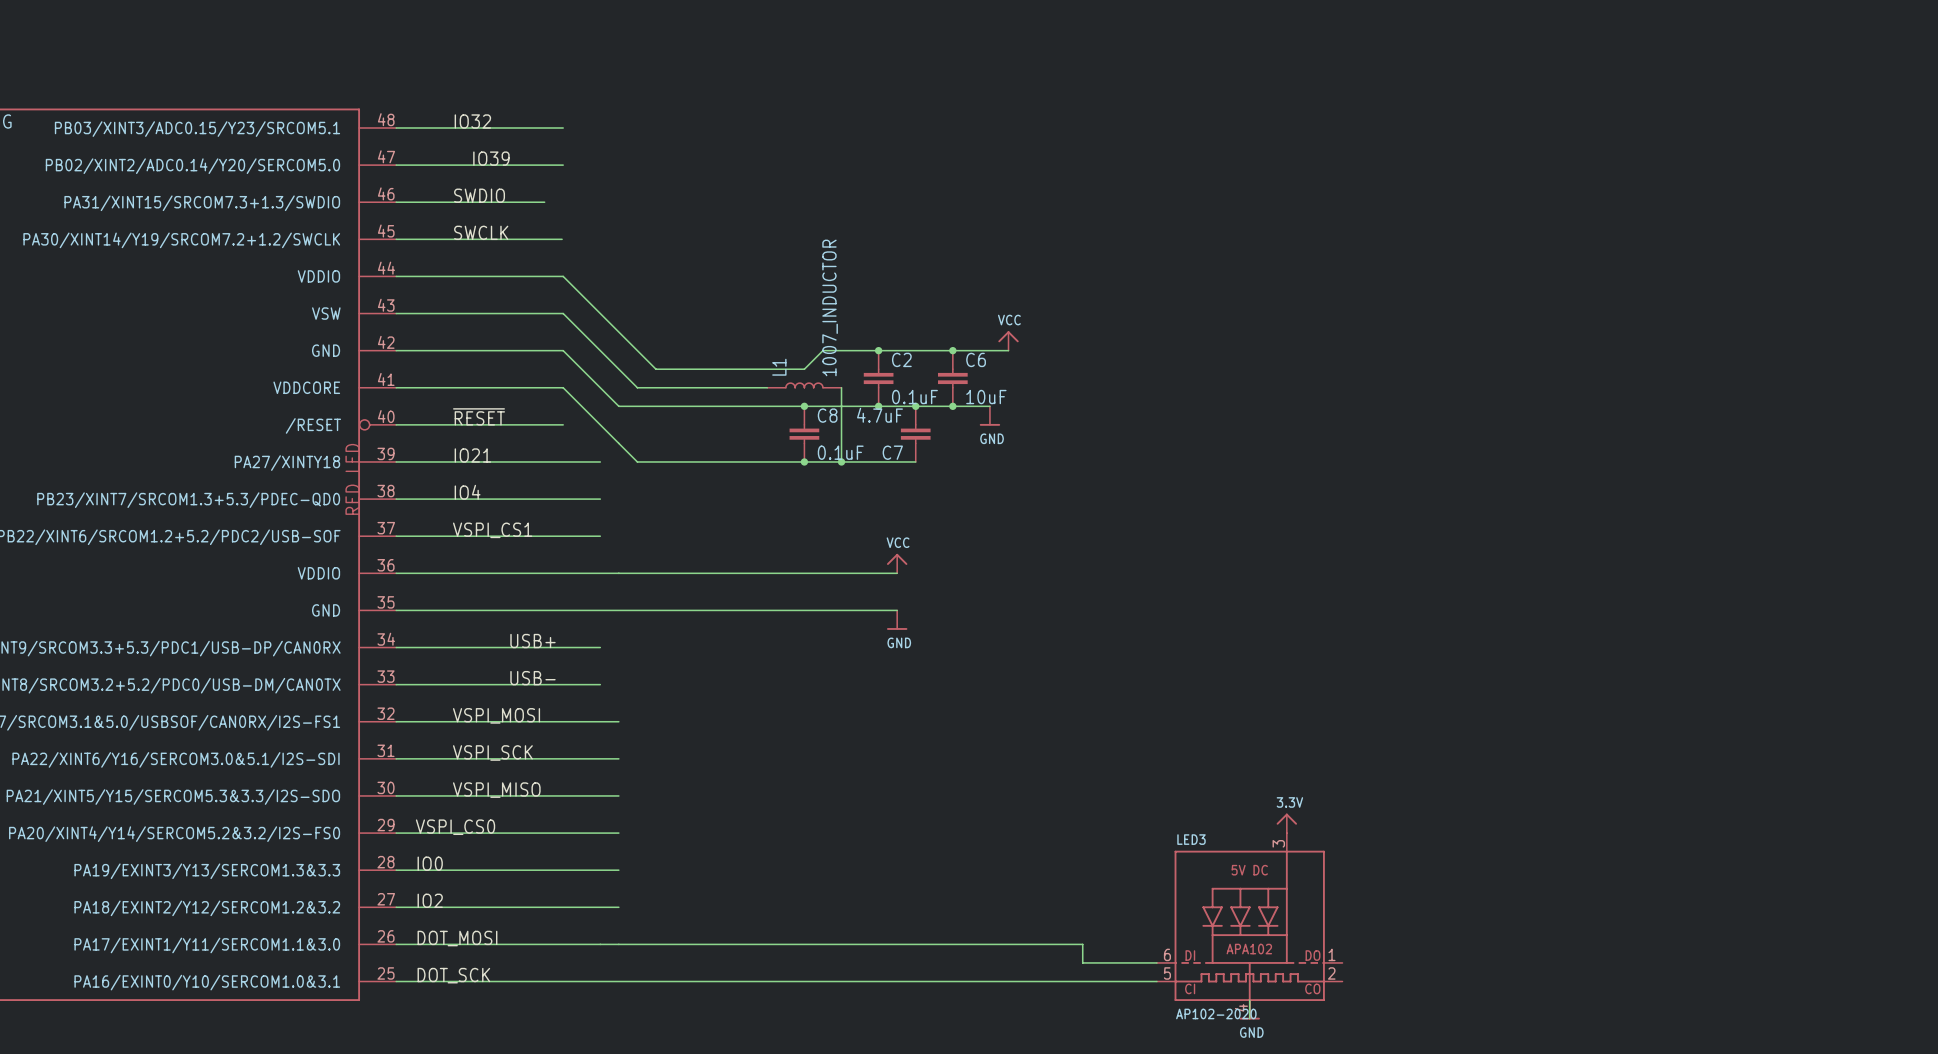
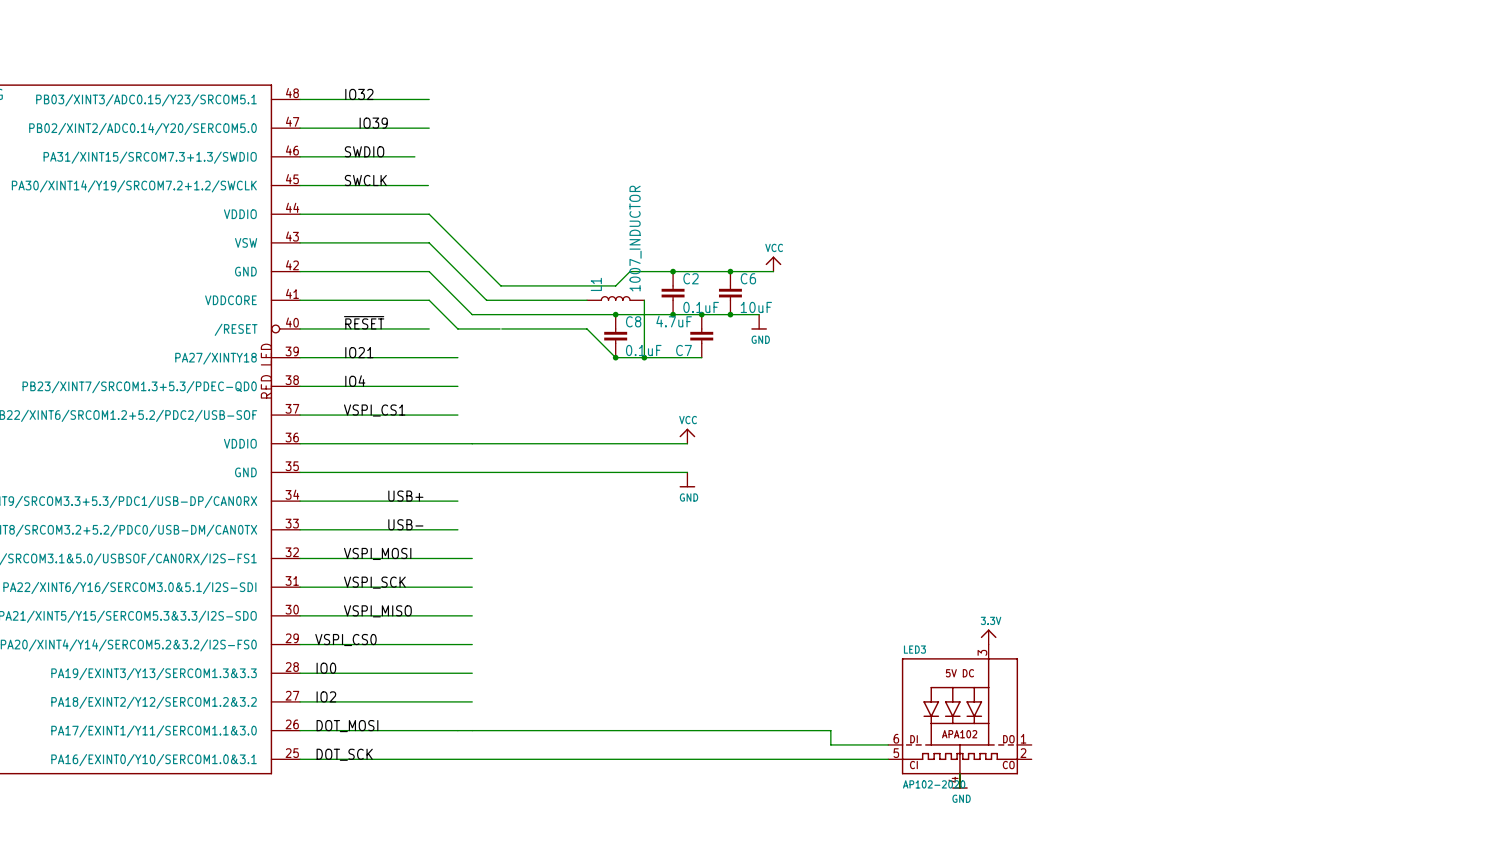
wire: (600, 424) (637, 461) (804, 461) -> (501, 328) (587, 328) (615, 357)
wire: none -> (457, 328) (500, 328)

